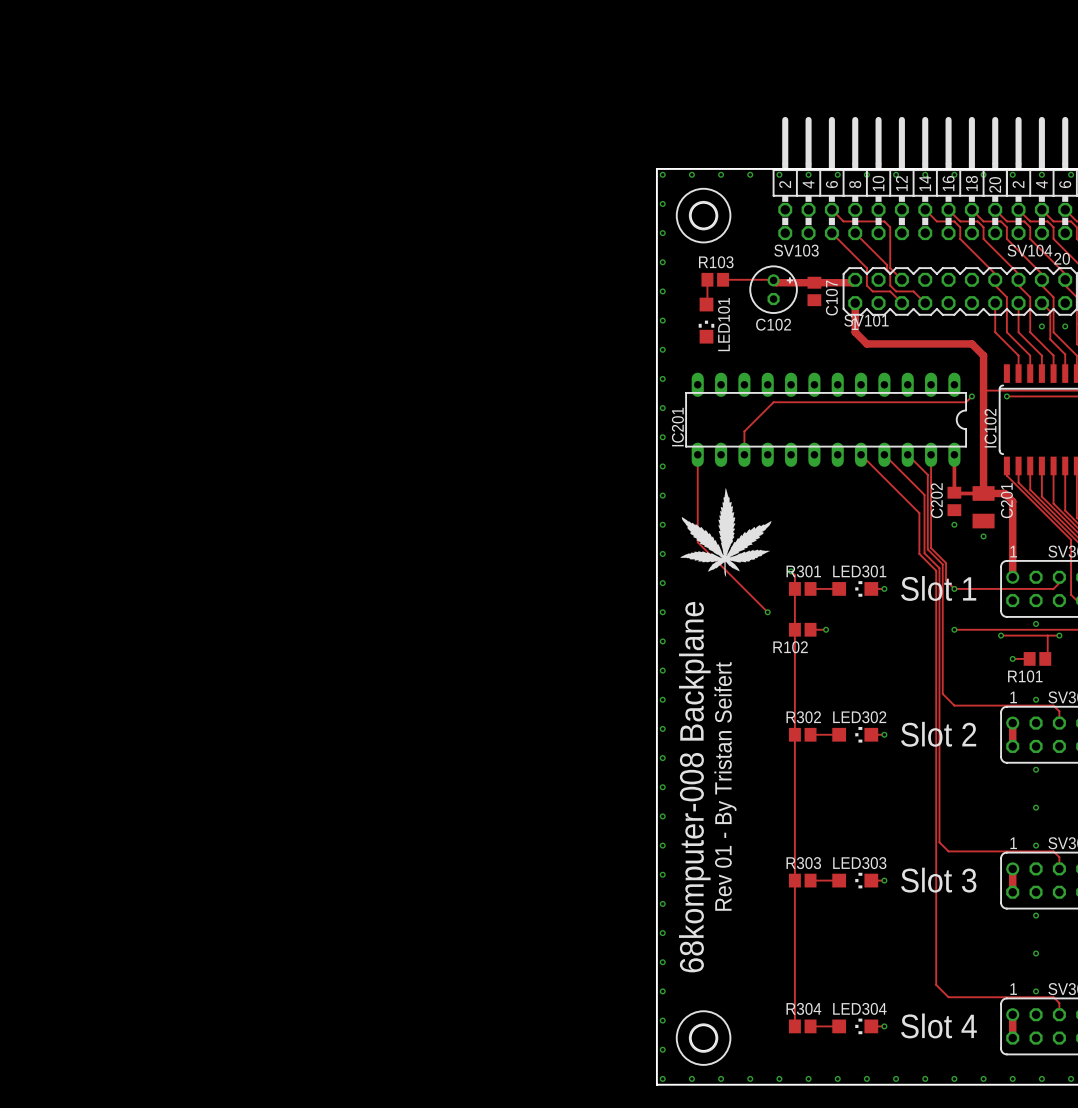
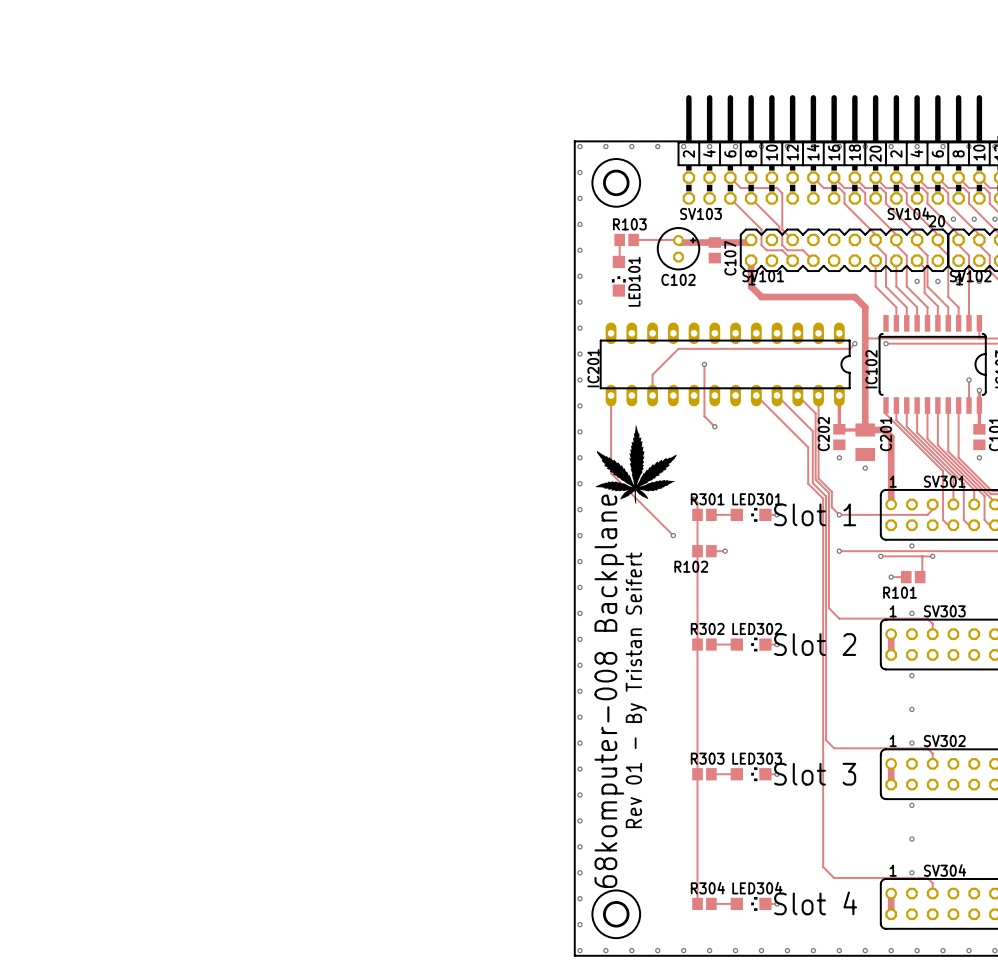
track: none -> (704, 364) (704, 416) (714, 426)
via: none -> (704, 364)
via: none -> (714, 426)

